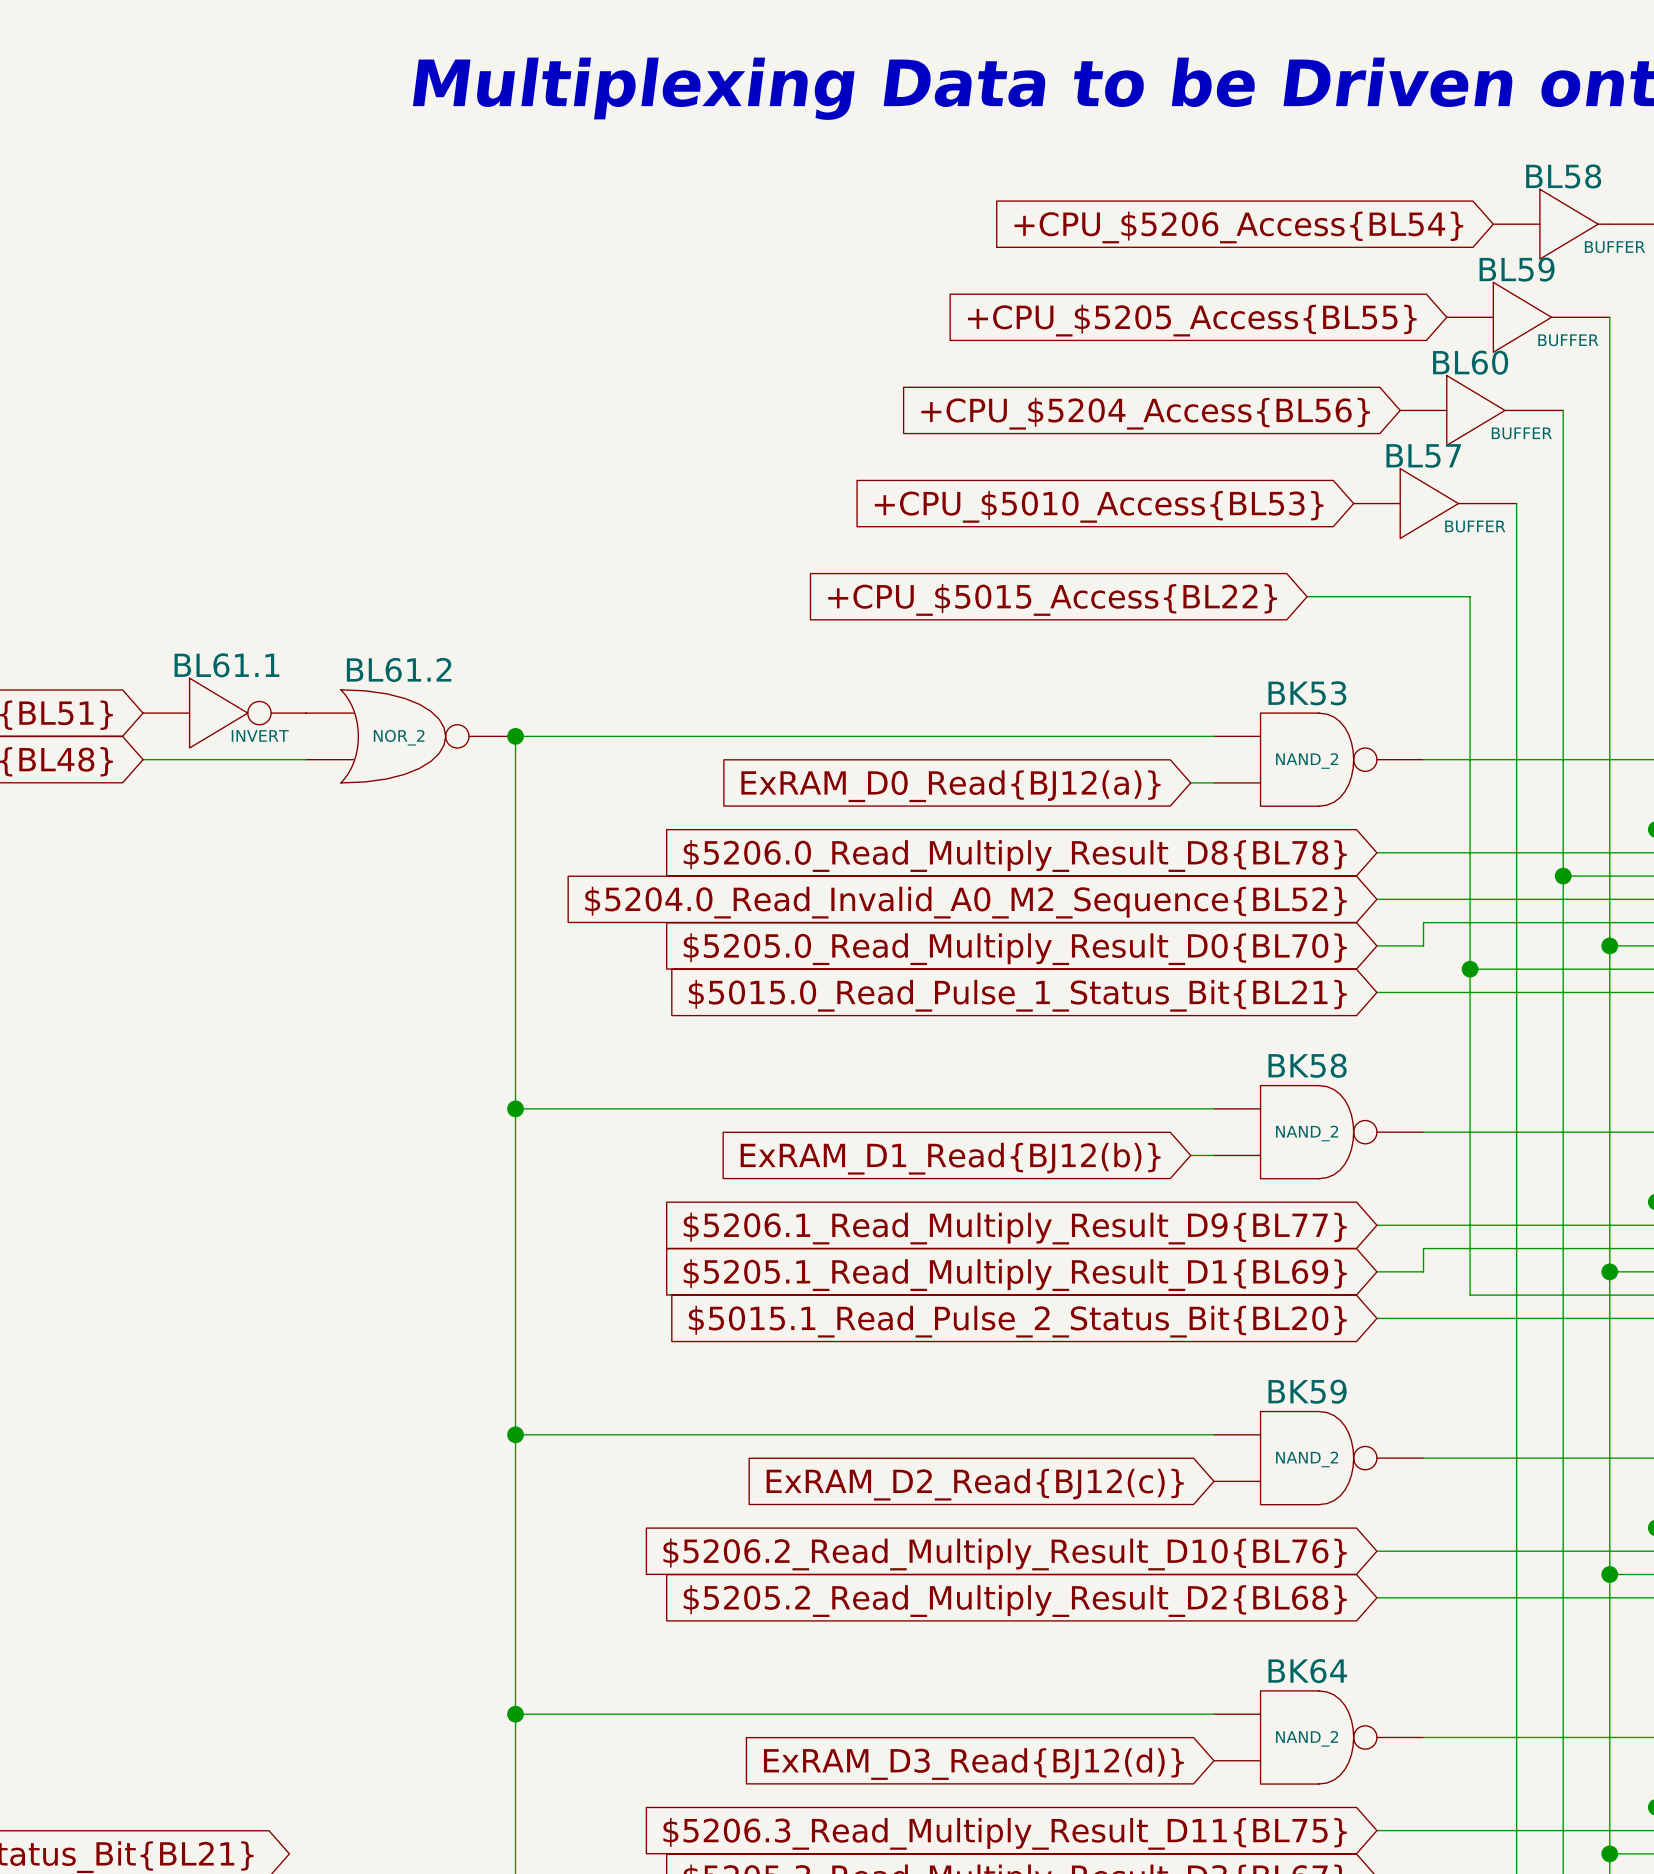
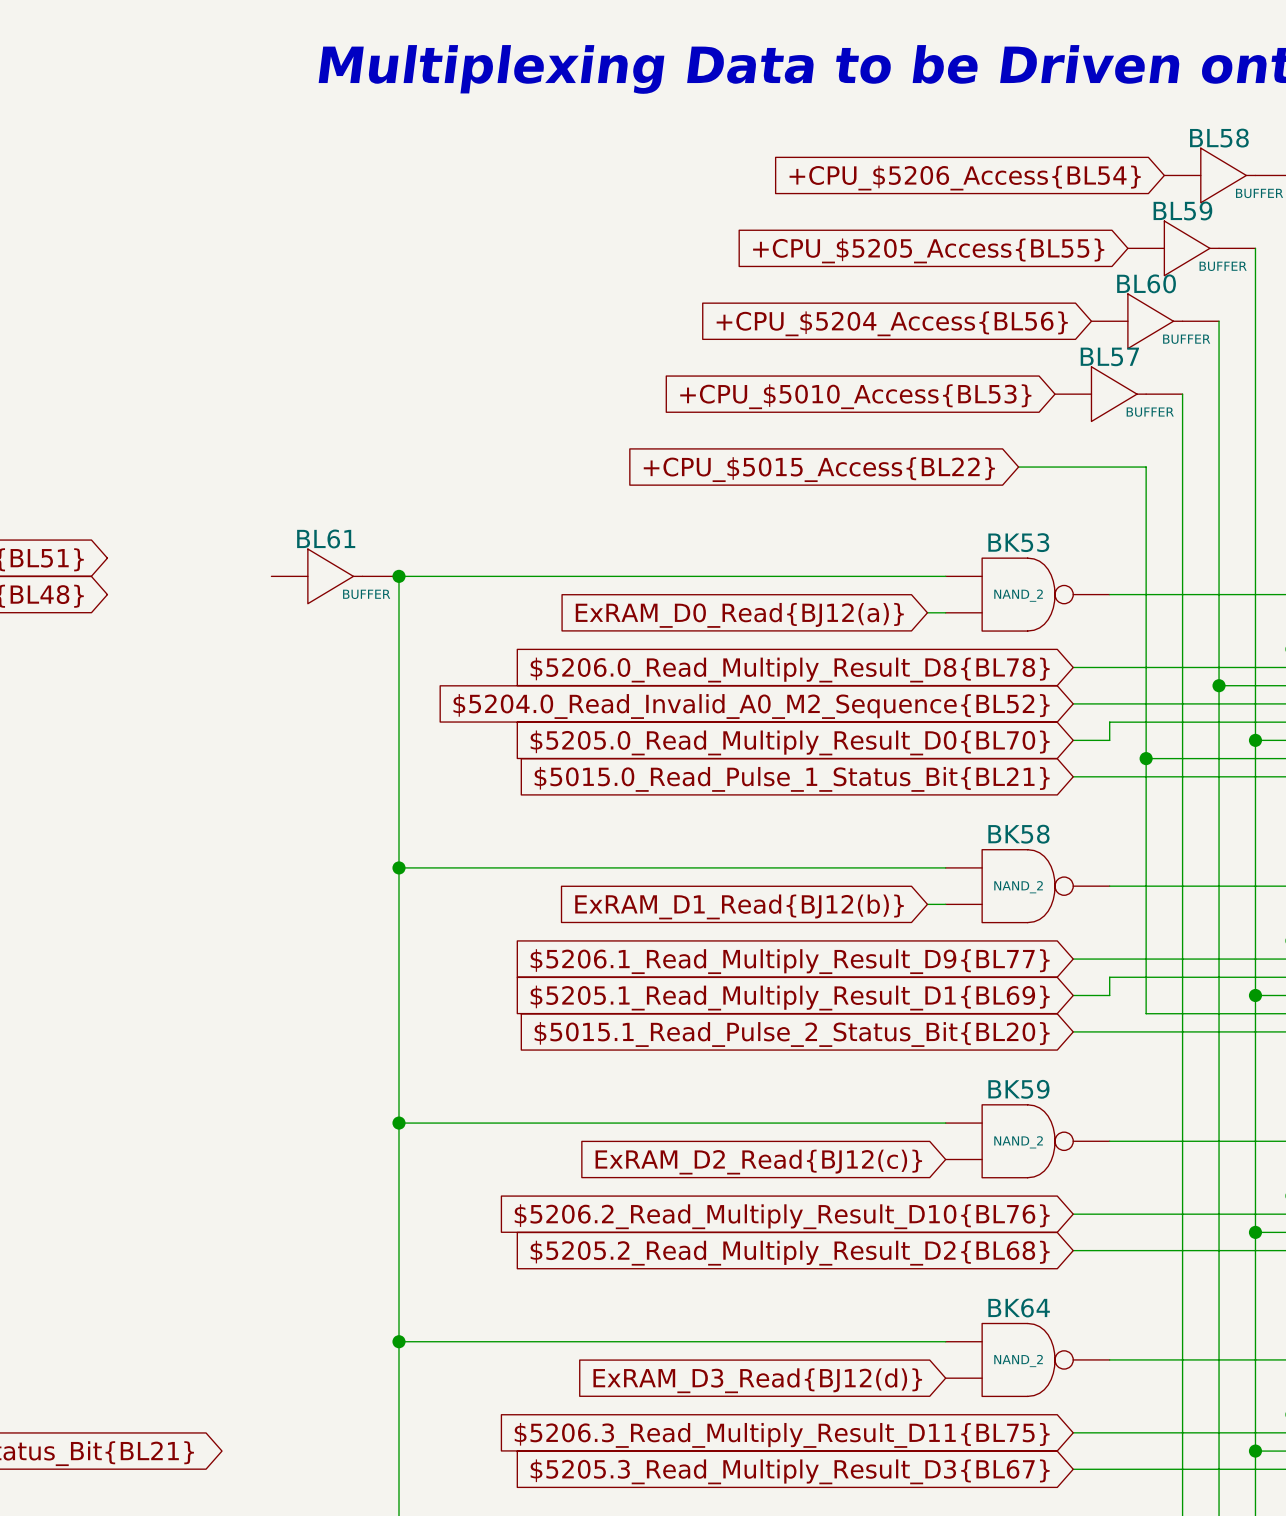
BL61.1: INVERT (224, 713) -> none
BL61.2: NOR_2 (410, 736) -> none
BL61: none -> BUFFER (335, 576)
wire: (143, 759) (306, 759) -> none

